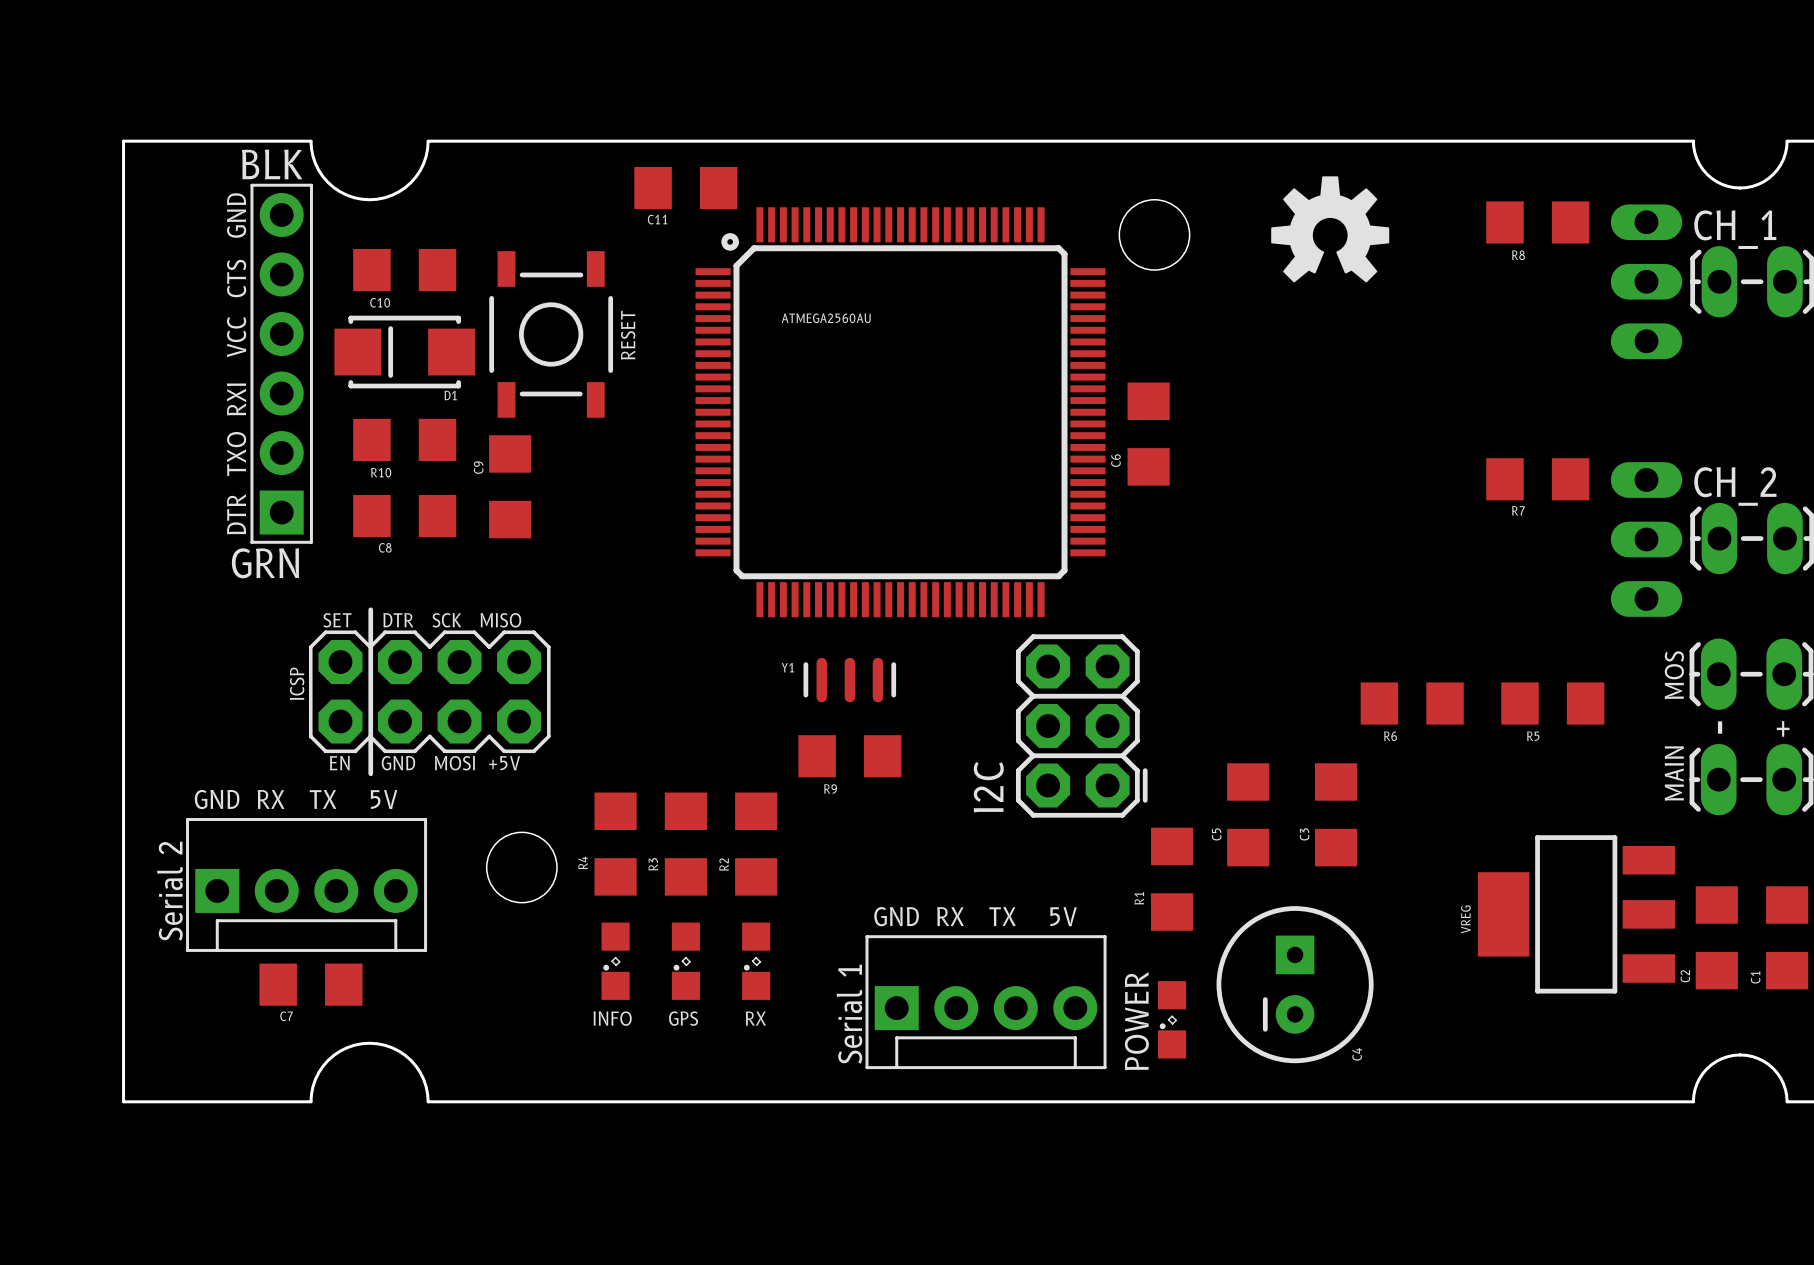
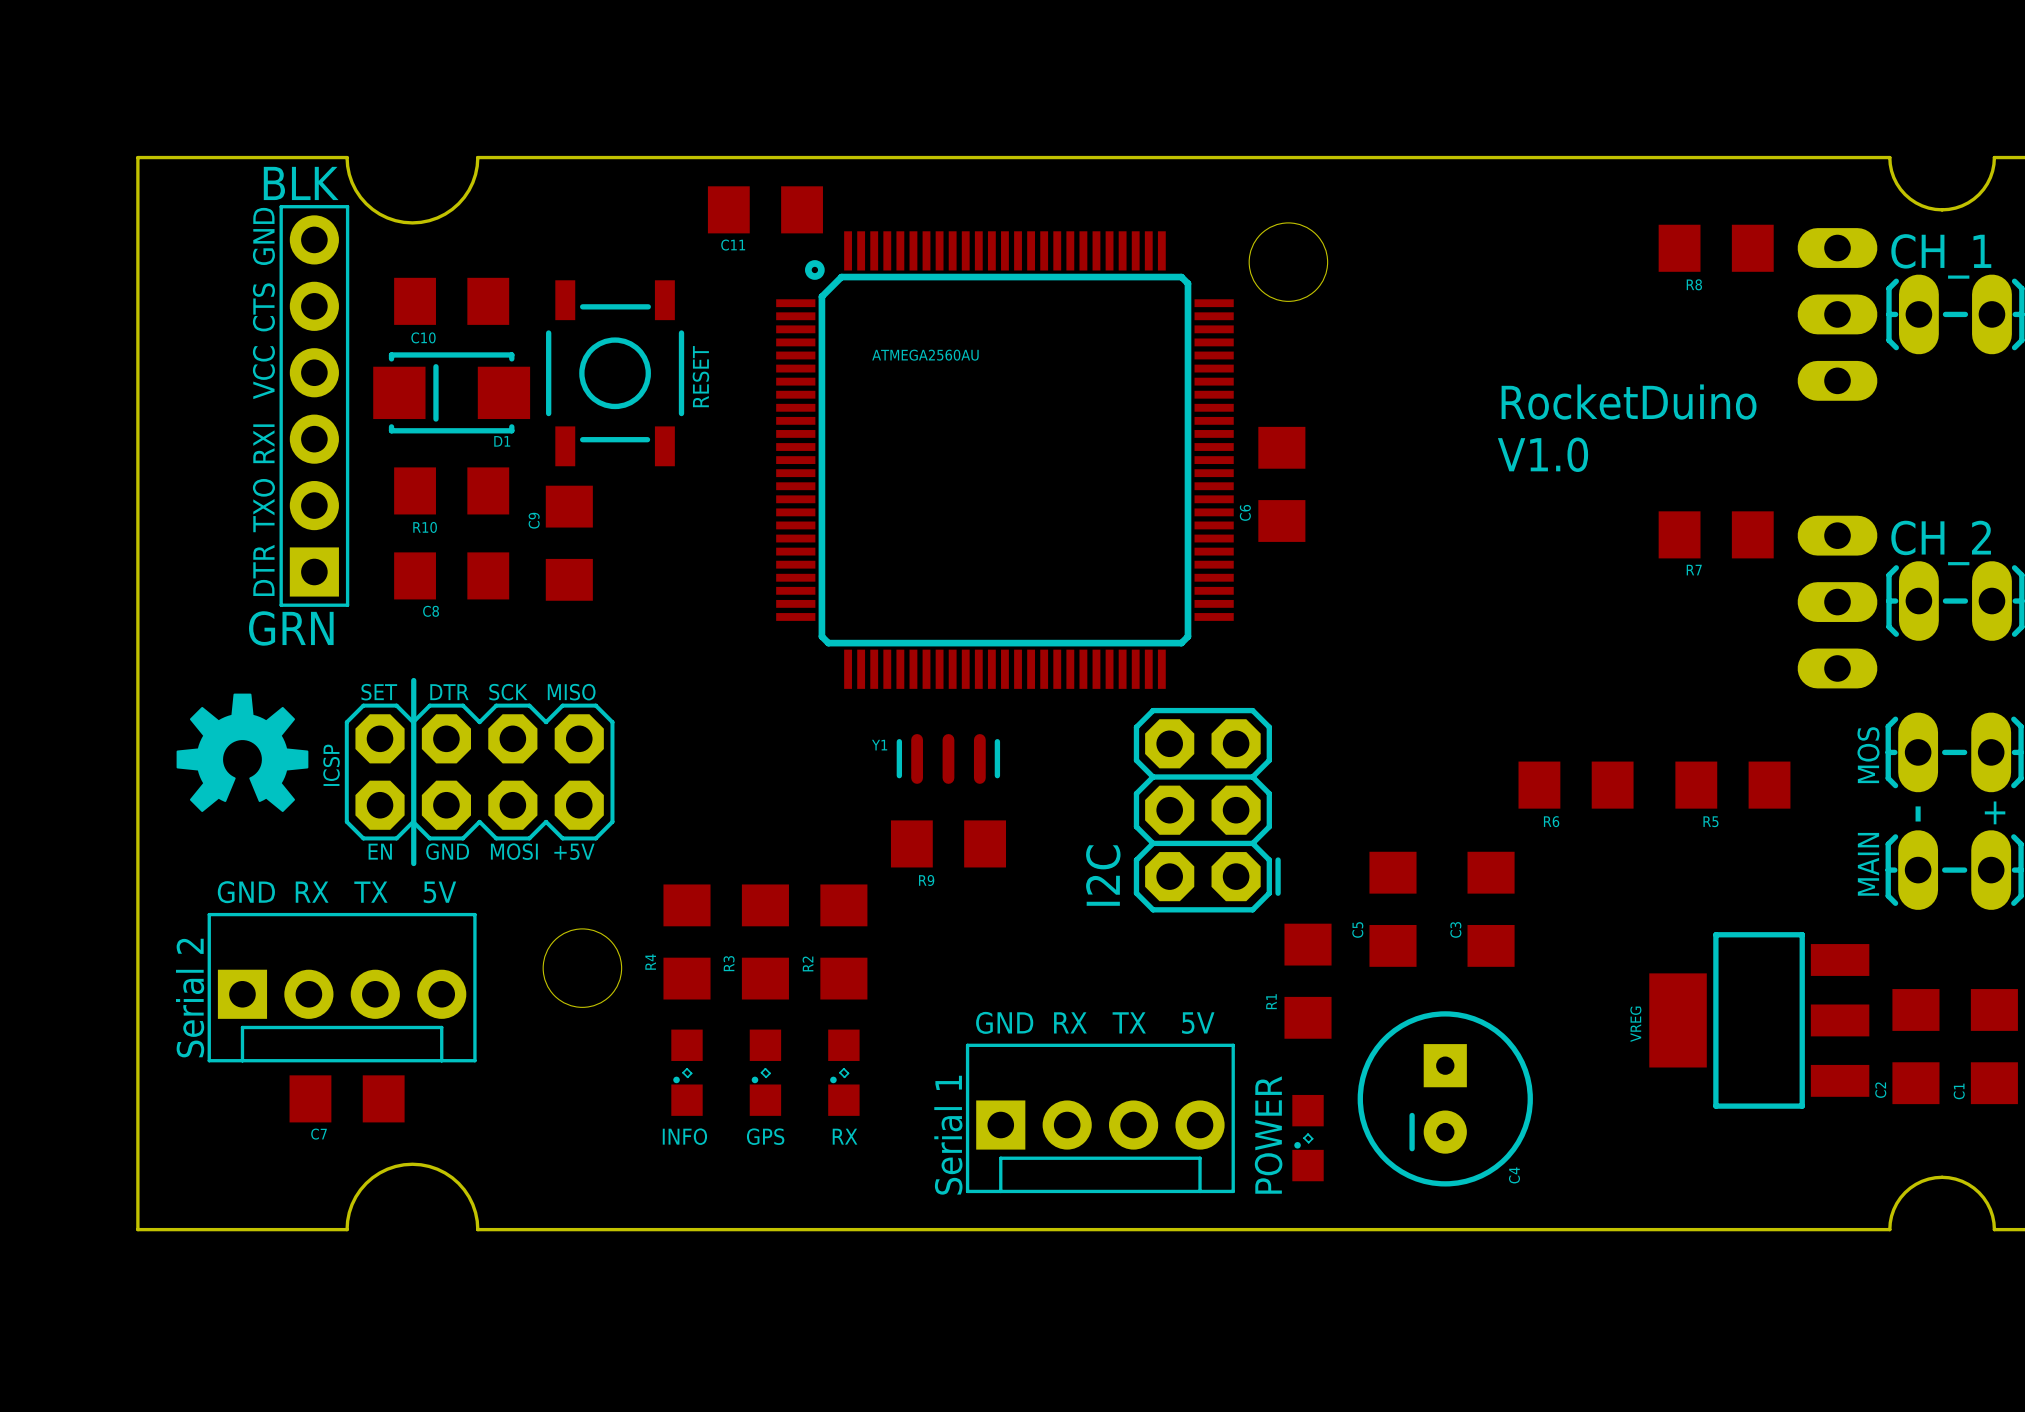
drawing: [1271, 176, 1390, 283] -> none
text: none -> RocketDuino (1629, 402)
text: none -> V1.0 (1543, 454)
drawing: none -> [176, 693, 309, 812]

